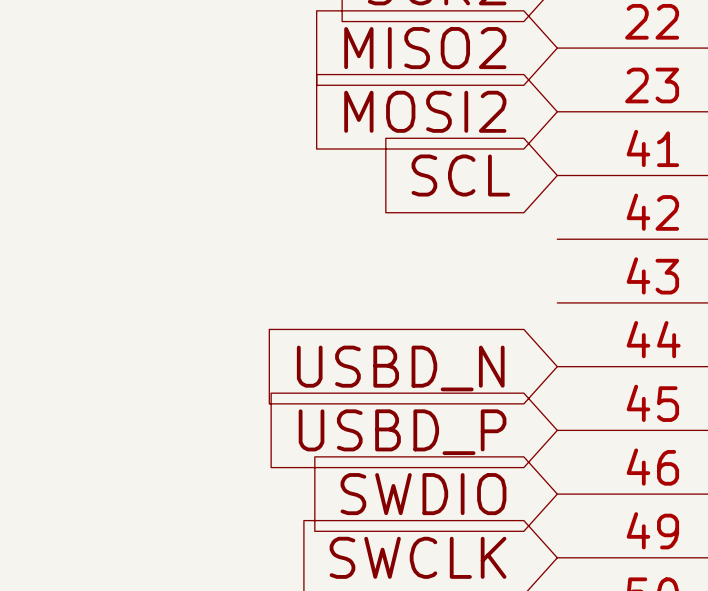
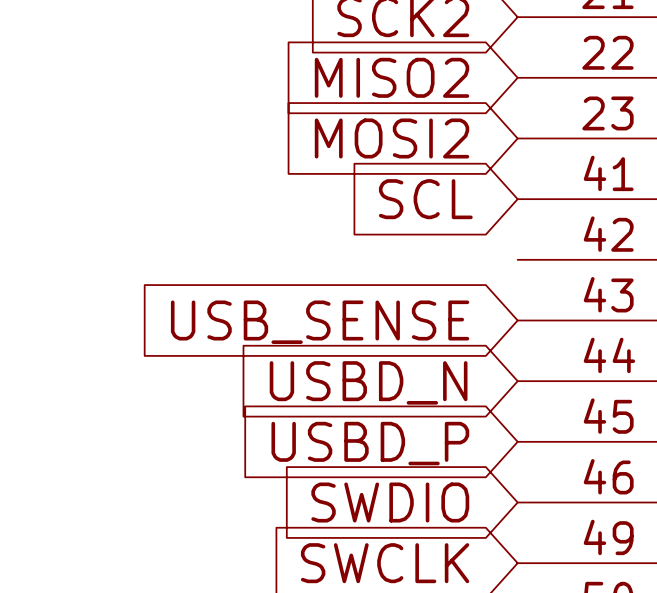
global label: none -> USB_SENSE (320, 322)

